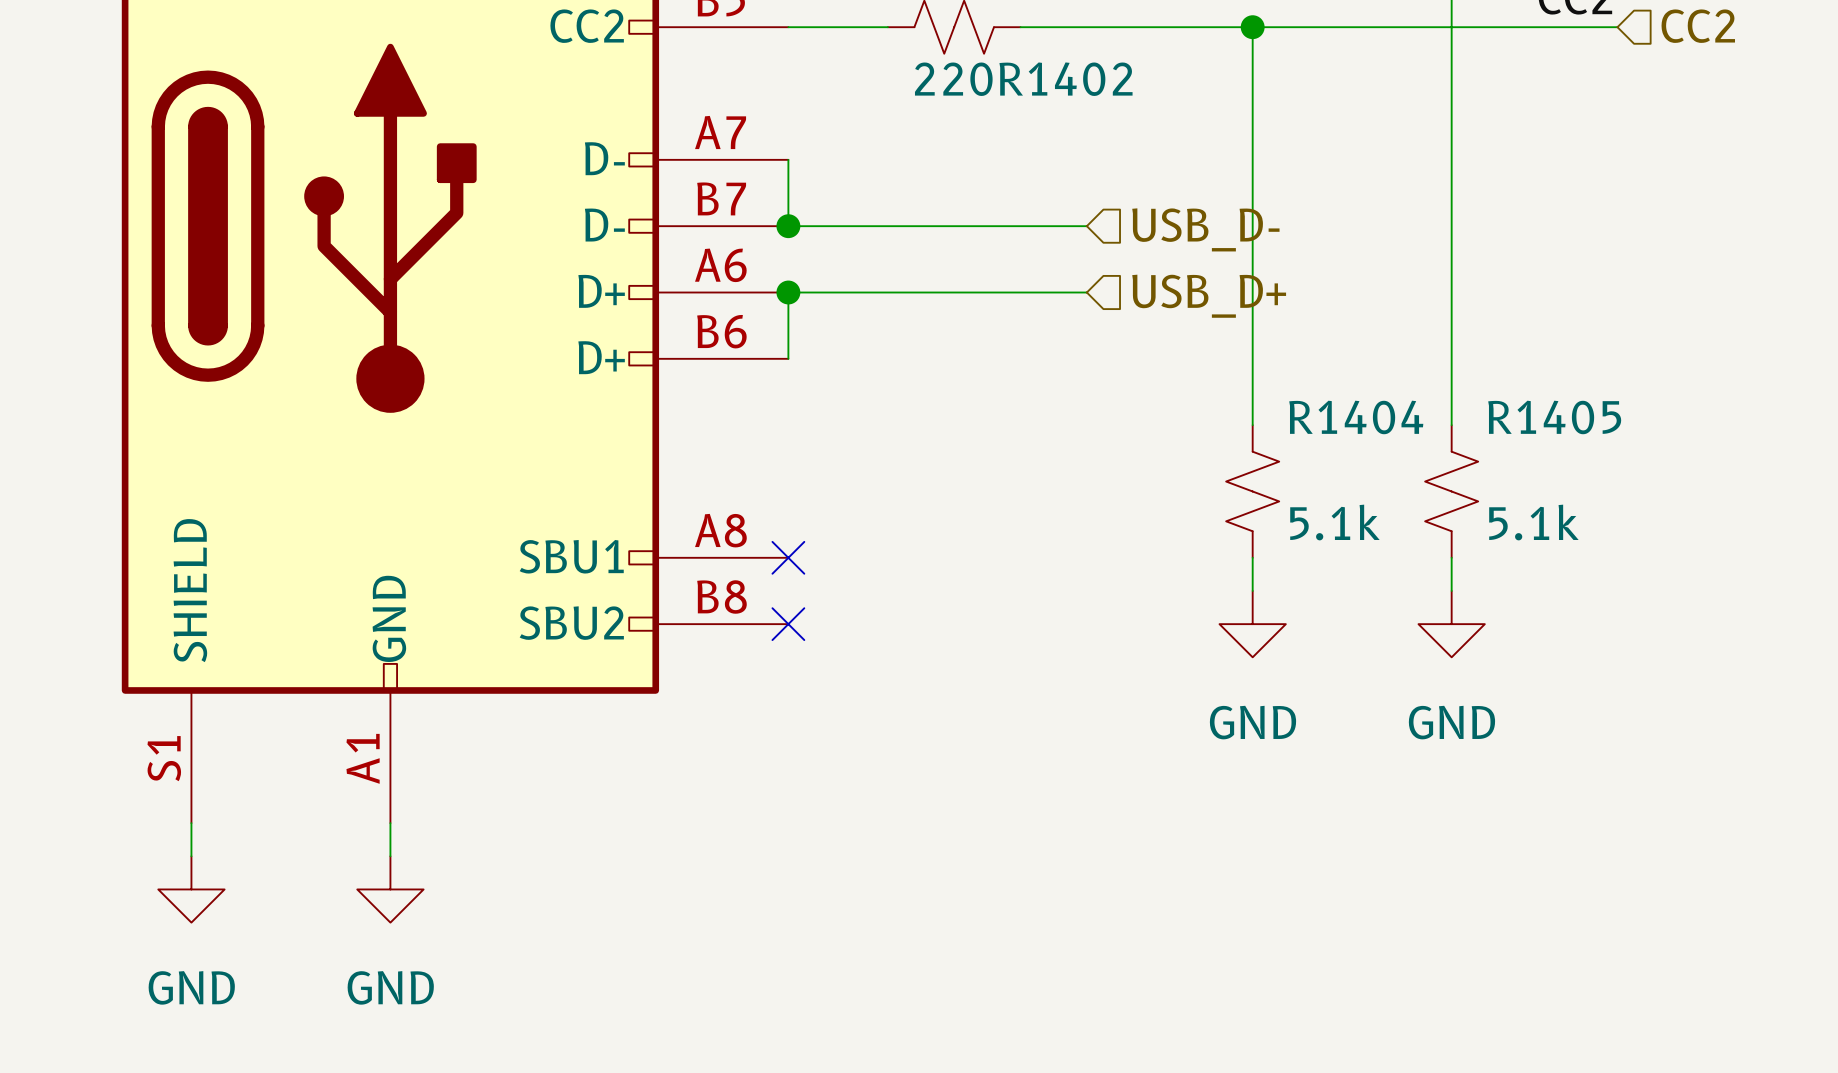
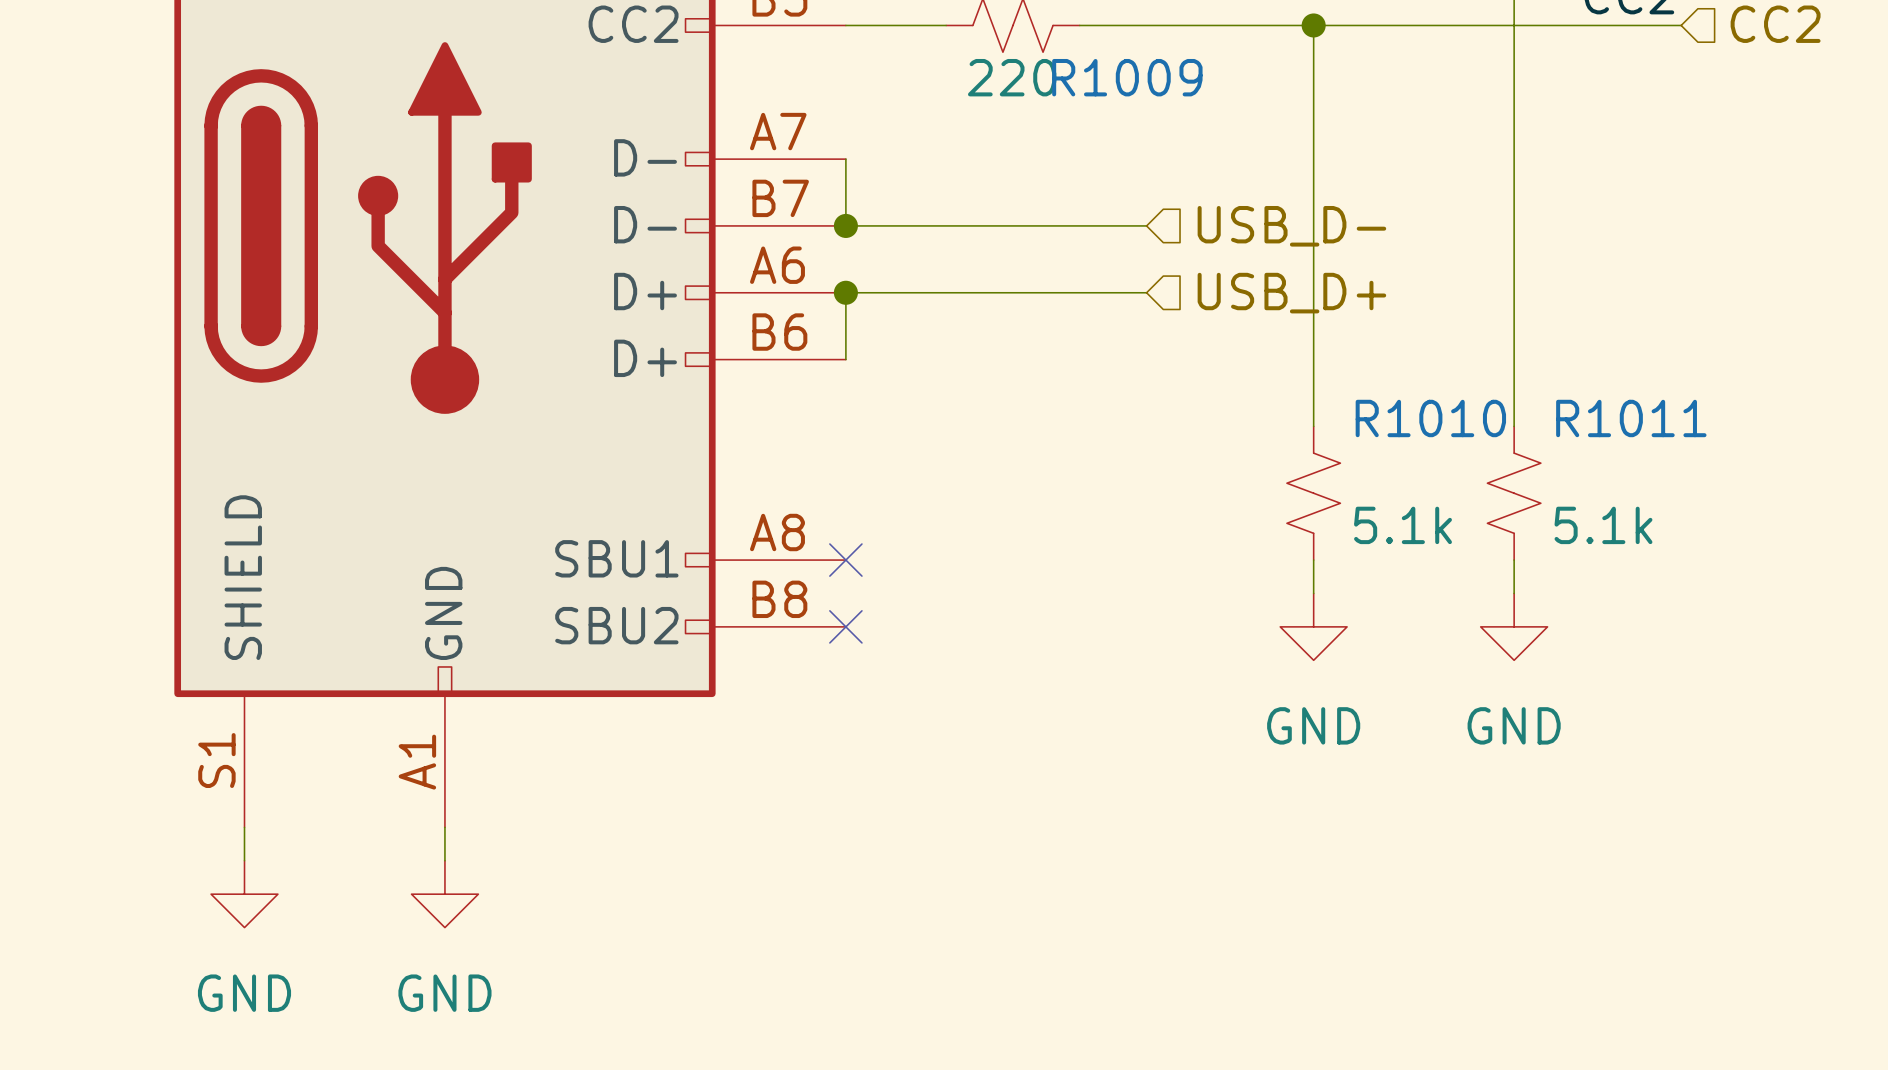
R1402 name: R1402 (1065, 79) -> R1009 (1127, 77)
R1404 name: R1404 (1356, 417) -> R1010 (1430, 418)
R1405 name: R1405 (1554, 417) -> R1011 (1631, 418)

